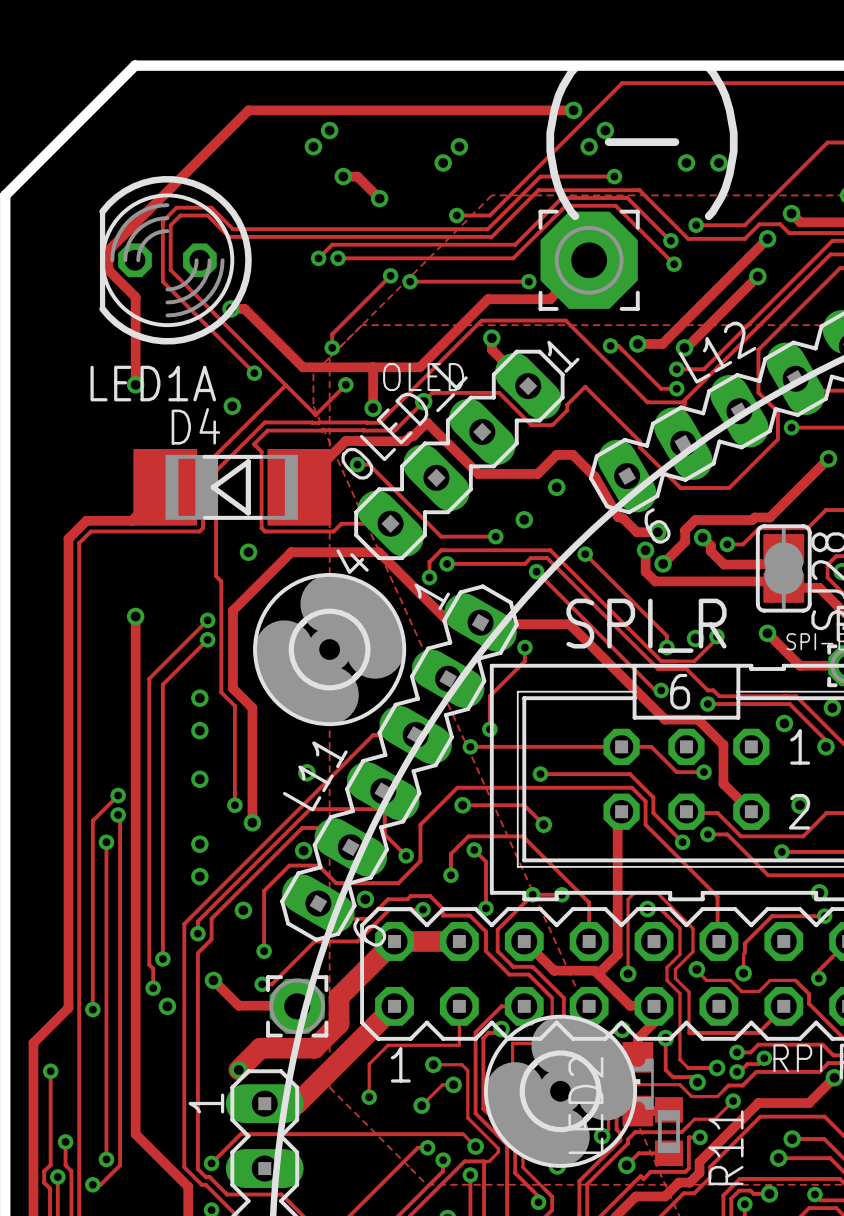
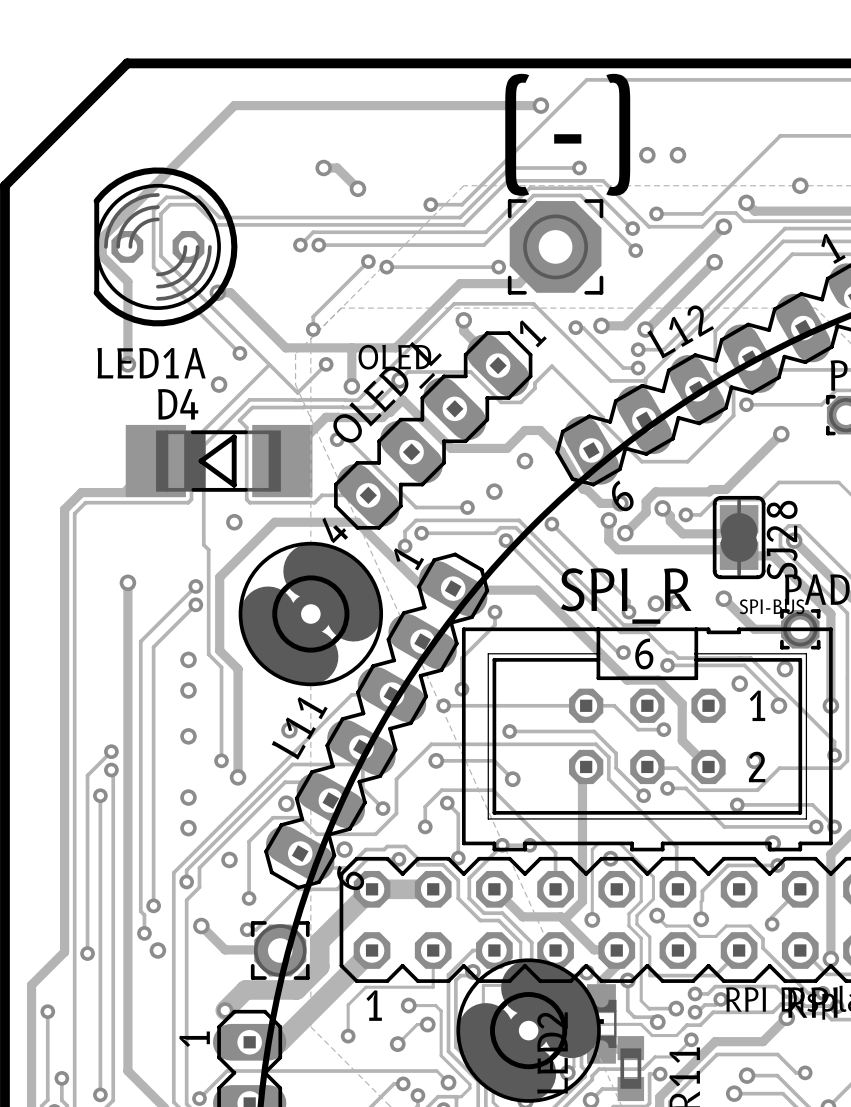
via: (329, 130) -> none
via: (605, 130) -> none
via: (313, 146) -> none
via: (459, 146) -> none
via: (589, 146) -> none
via: (443, 162) -> none

